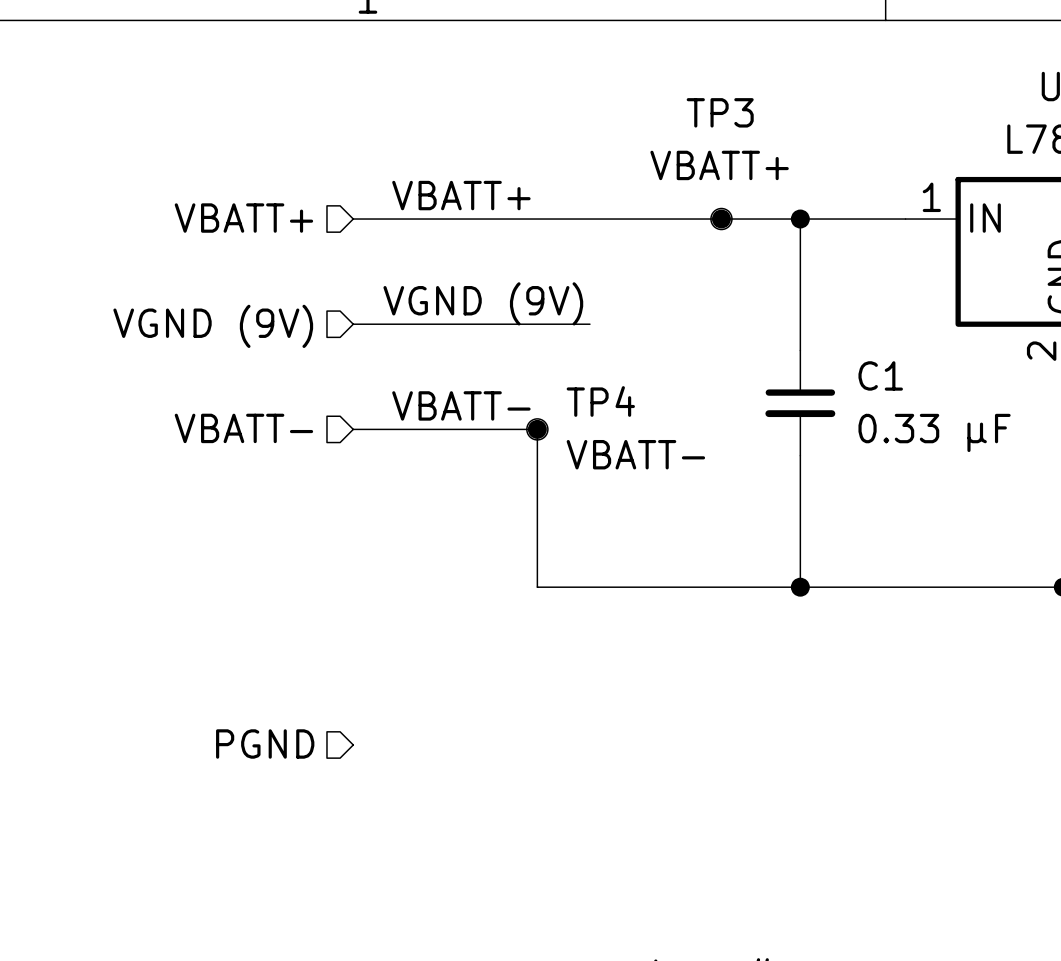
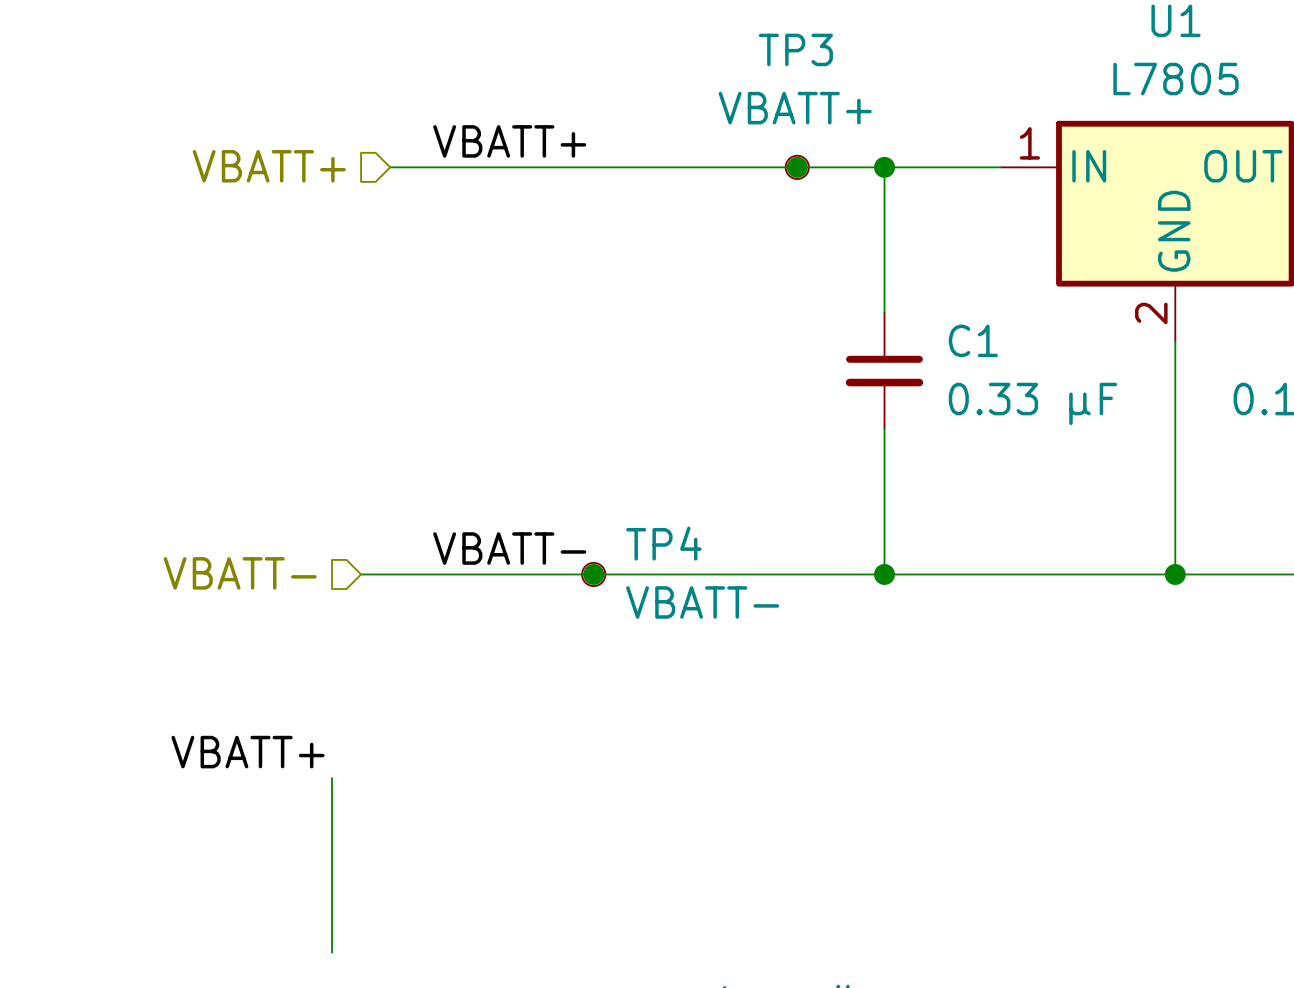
label: VGND (9V) (483, 303) -> none
wire: (353, 324) (589, 324) -> none
hierarchical label: VGND (9V) (213, 326) -> none
label position: VBATT- (461, 405) -> VBATT- (509, 548)
hierarchical label position: VBATT- (243, 428) -> VBATT- (240, 573)
wire: (353, 429) (537, 429) (537, 587) -> (361, 574) (593, 574)
junction: (537, 429) -> none
TP4 position: (537, 429) -> (593, 574)
junction: none -> (593, 574)
hierarchical label: PGND (265, 743) -> none
label: none -> VBATT+ (248, 752)
wire: none -> (332, 778) (332, 952)

